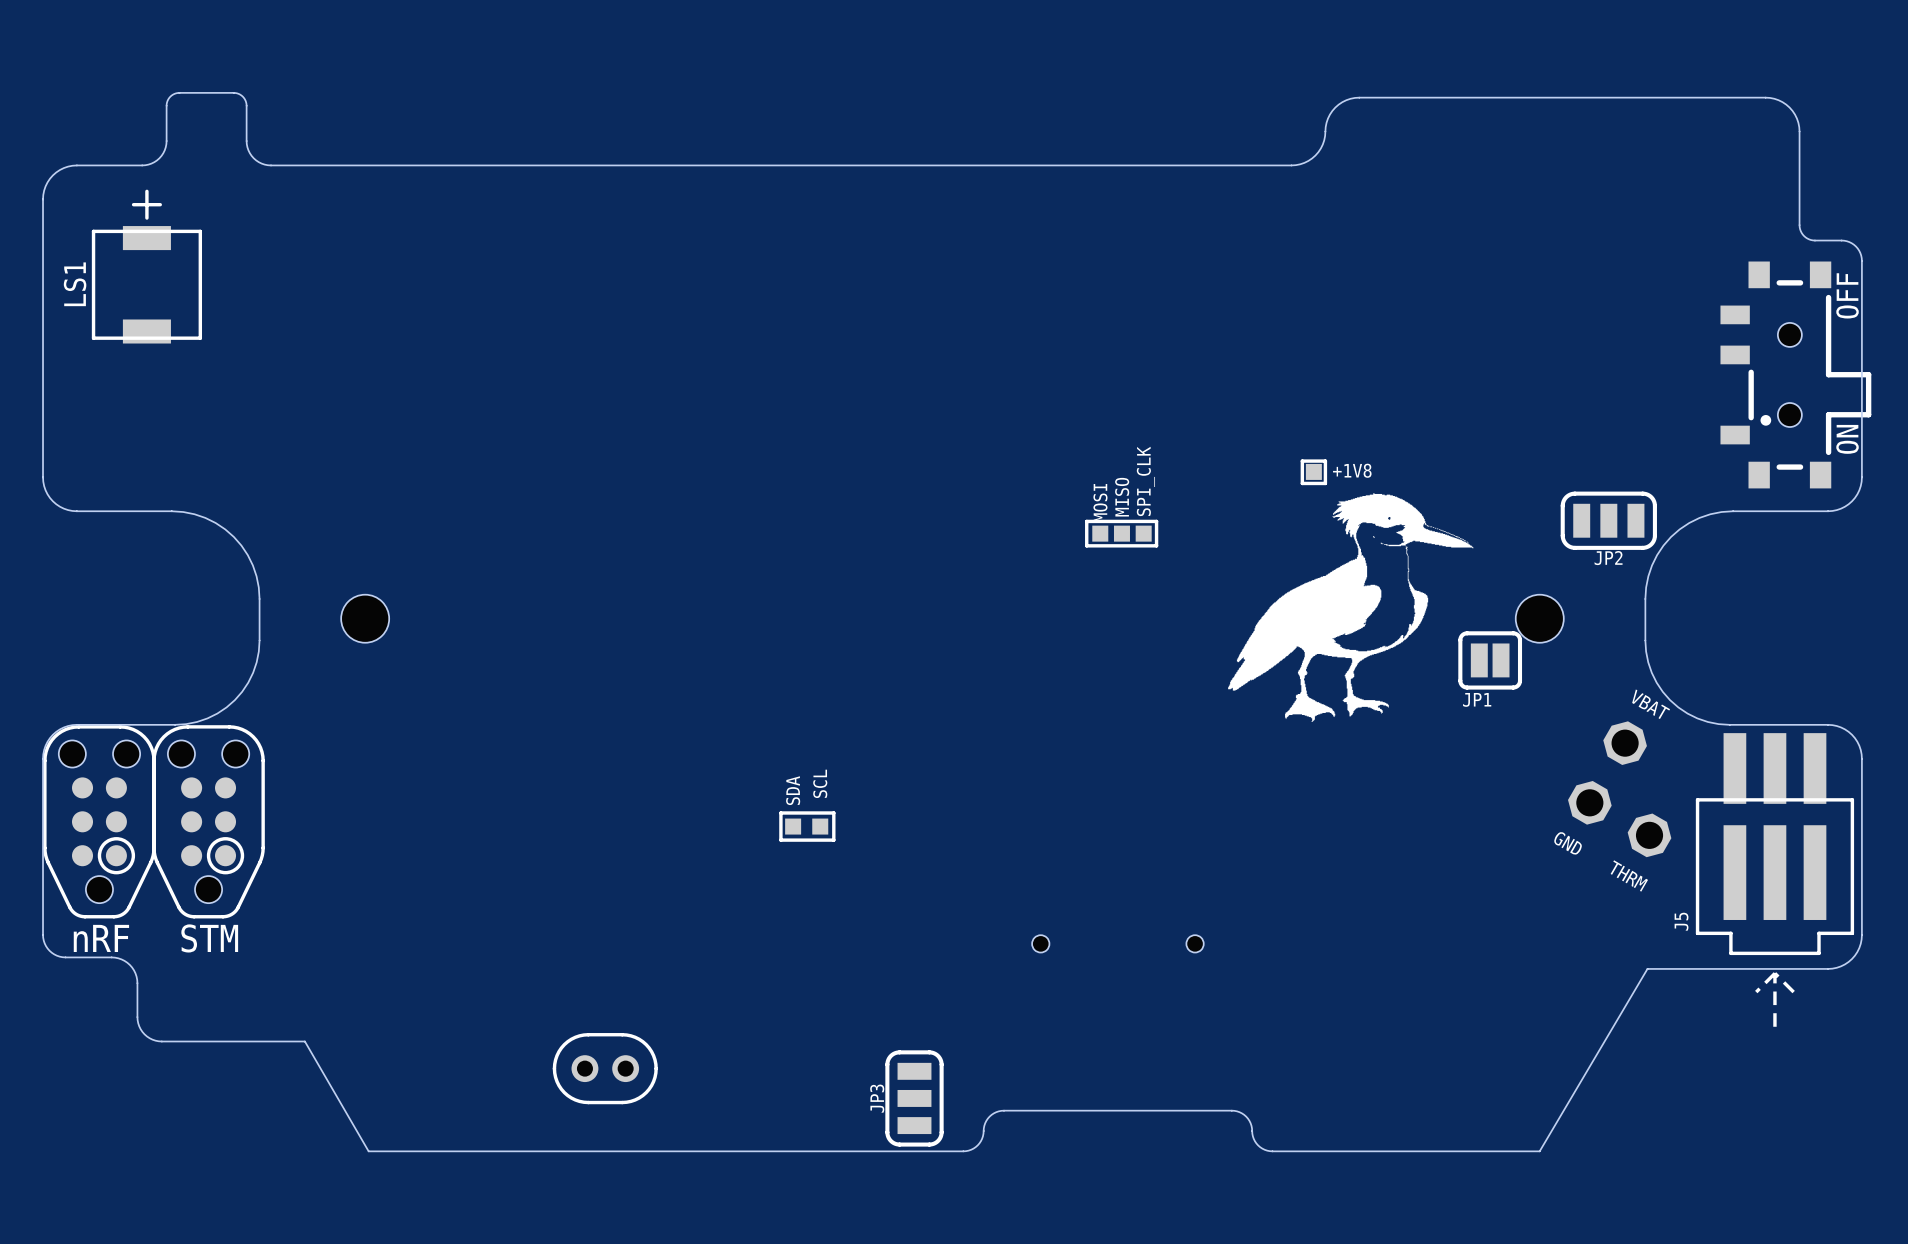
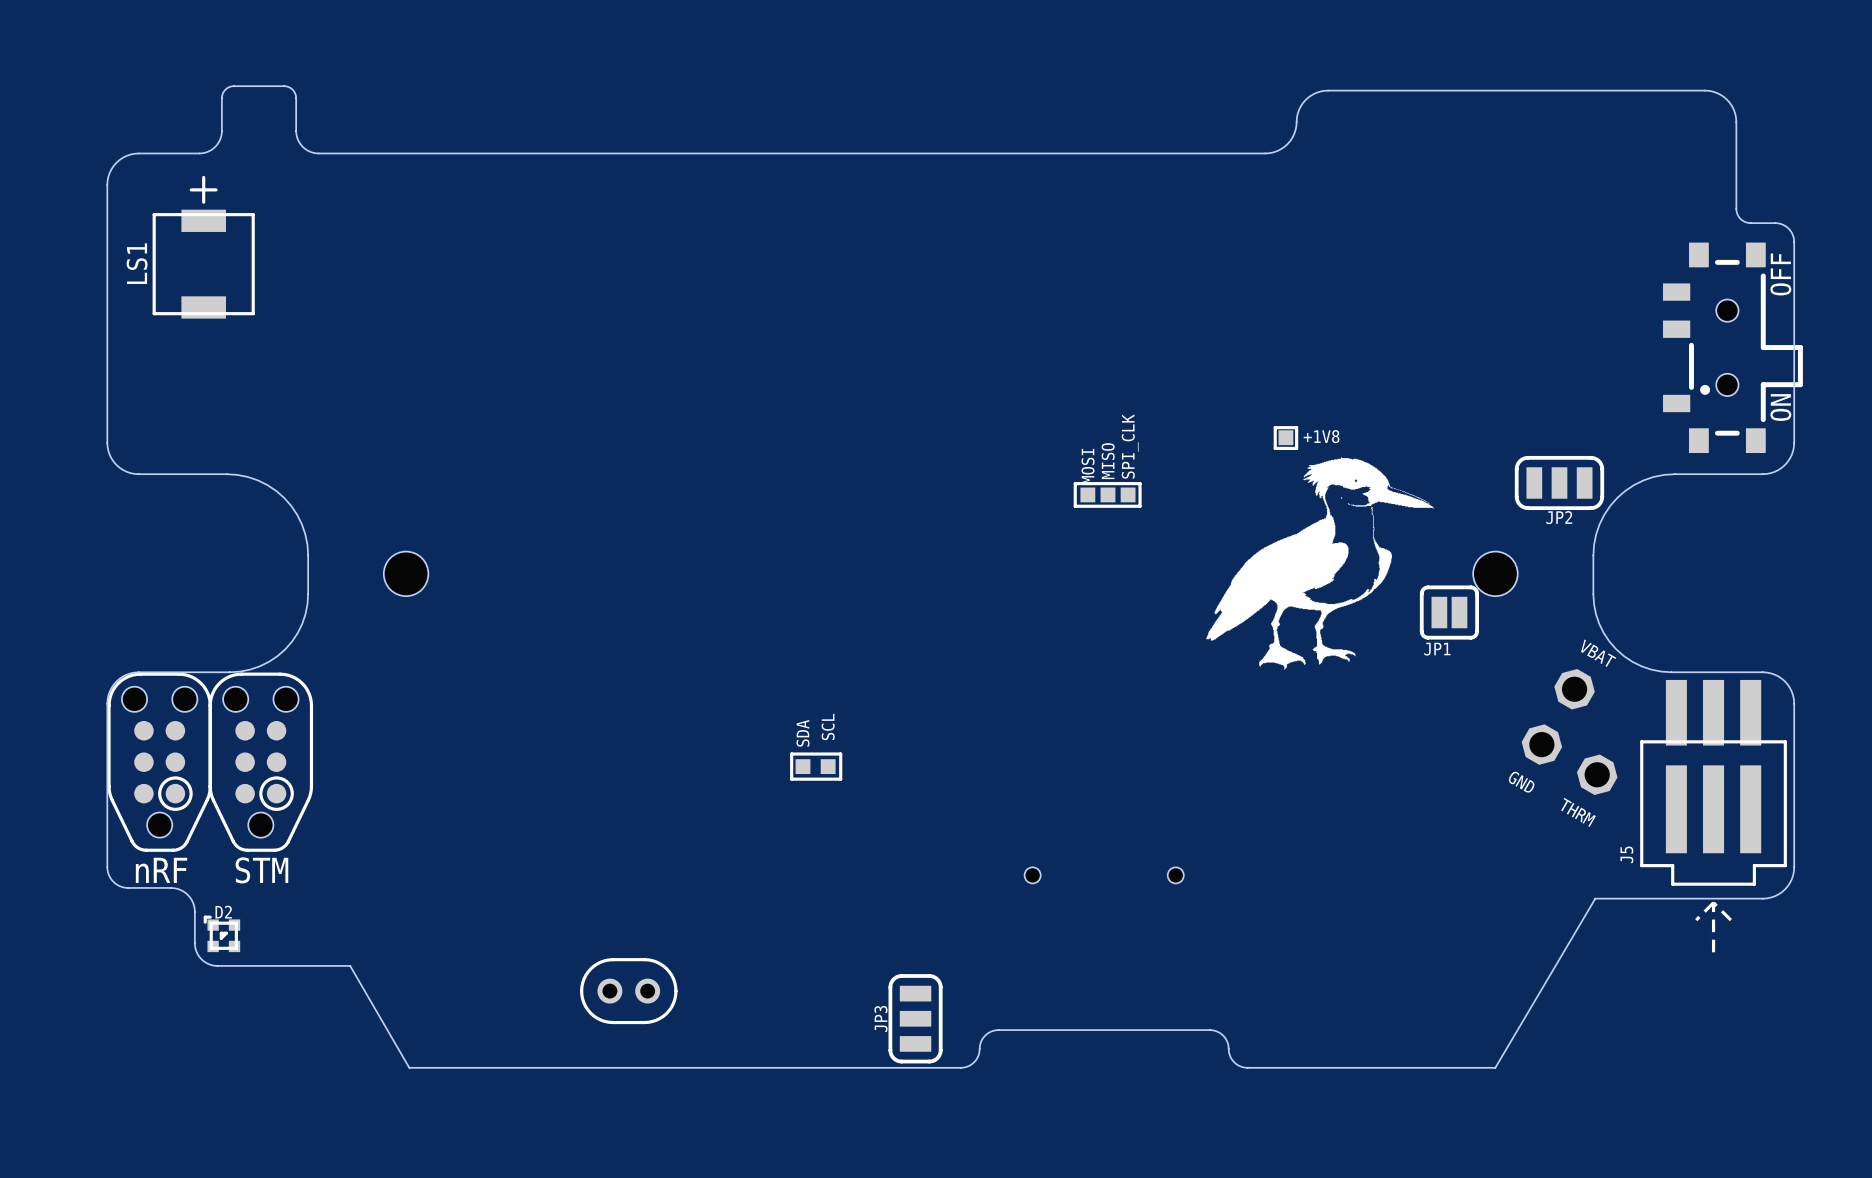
D2: none -> (221, 933)

